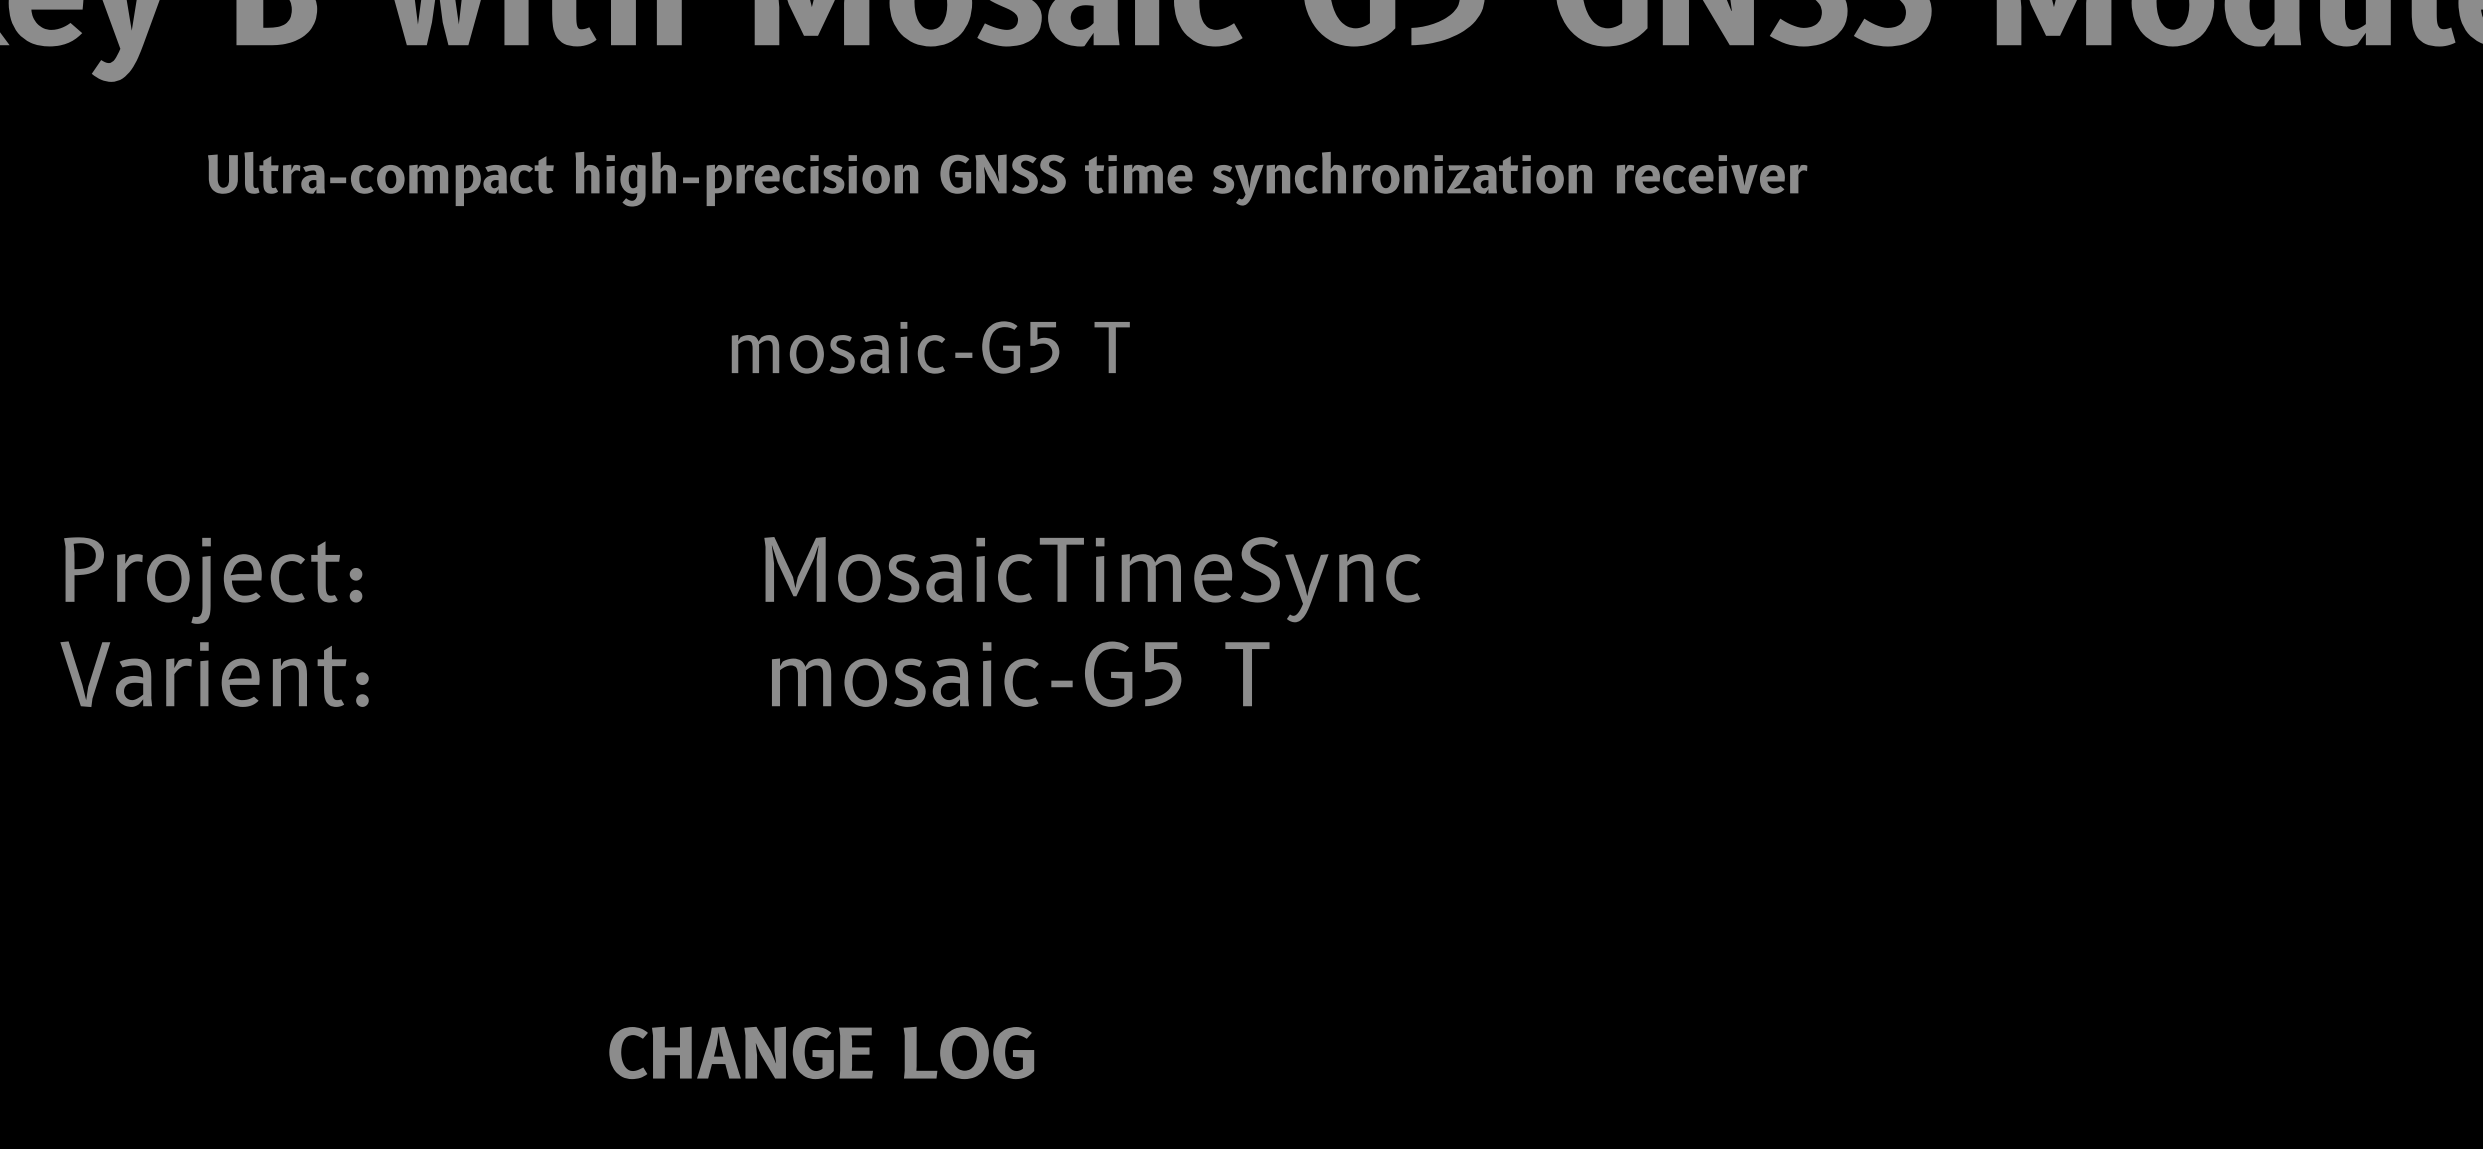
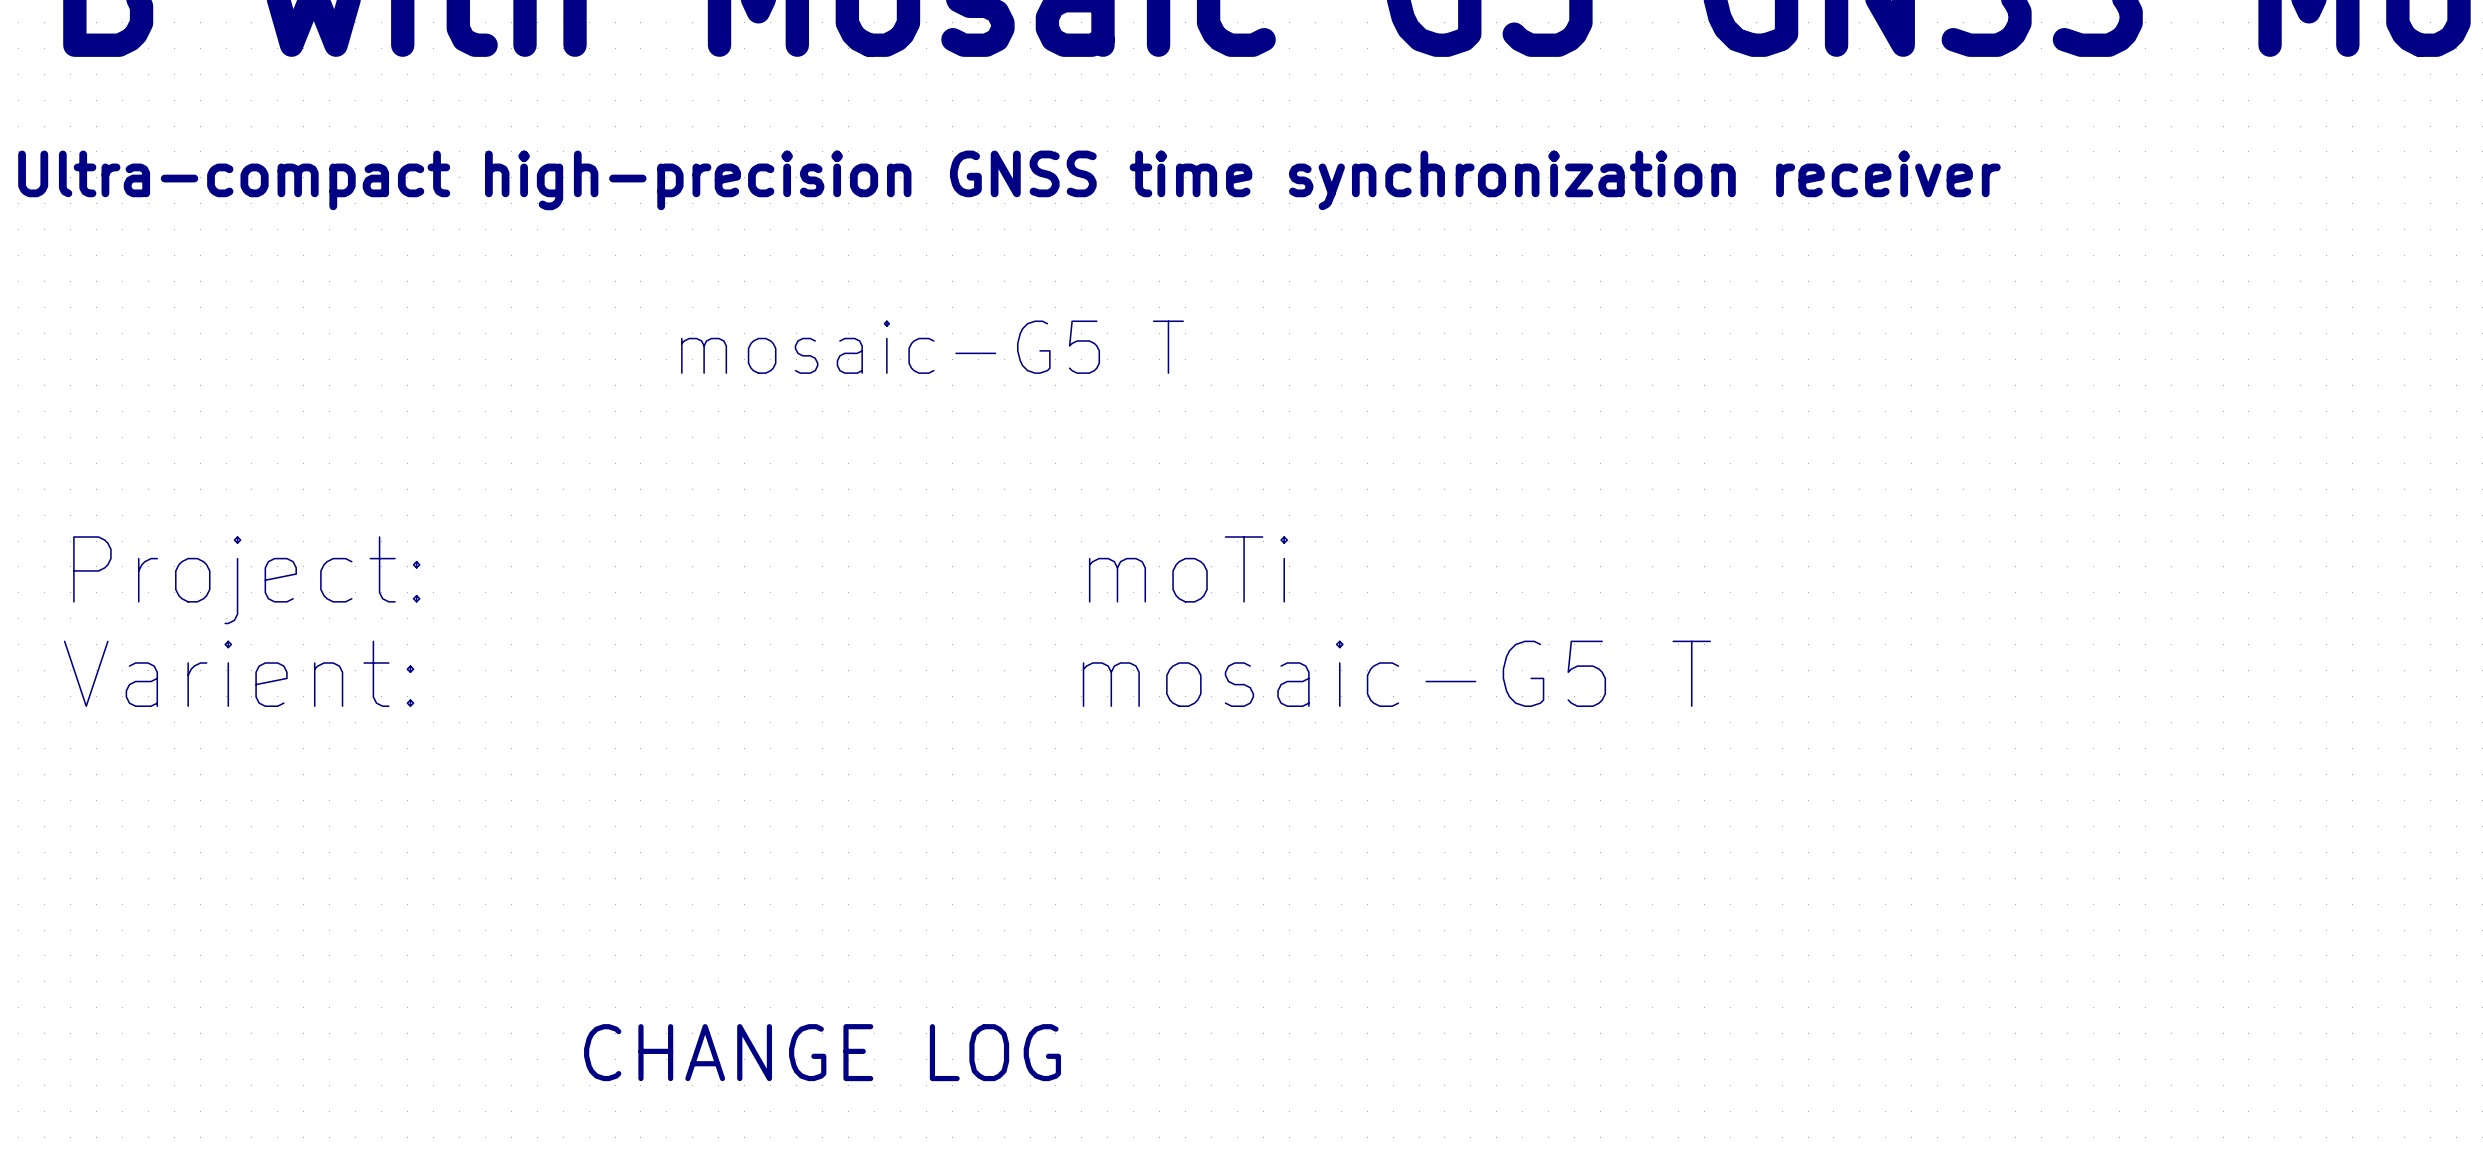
text: Project: MosaicTimeSync (742, 580) -> Project: moTi (680, 580)

